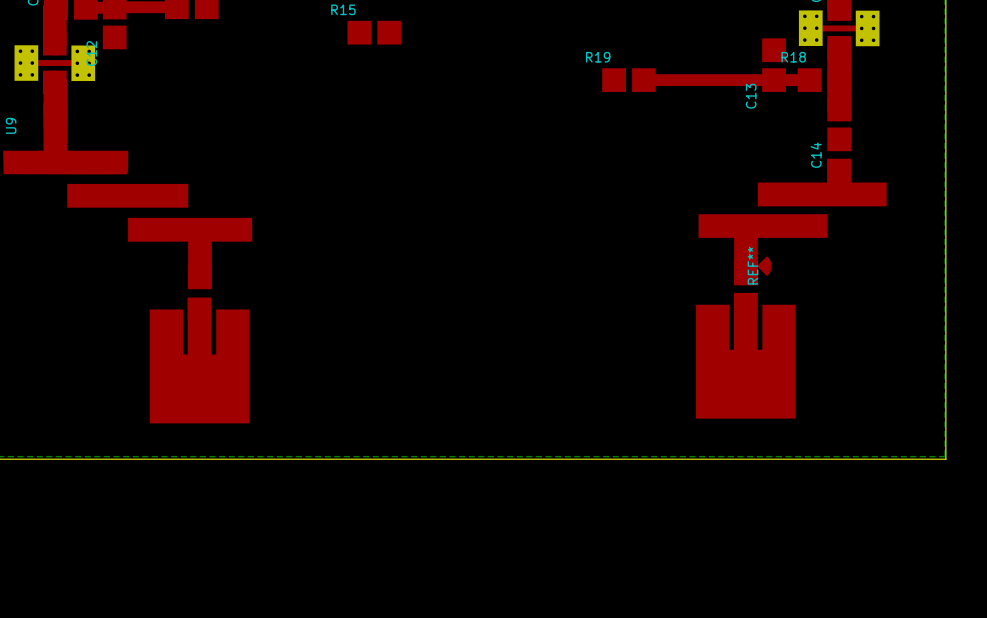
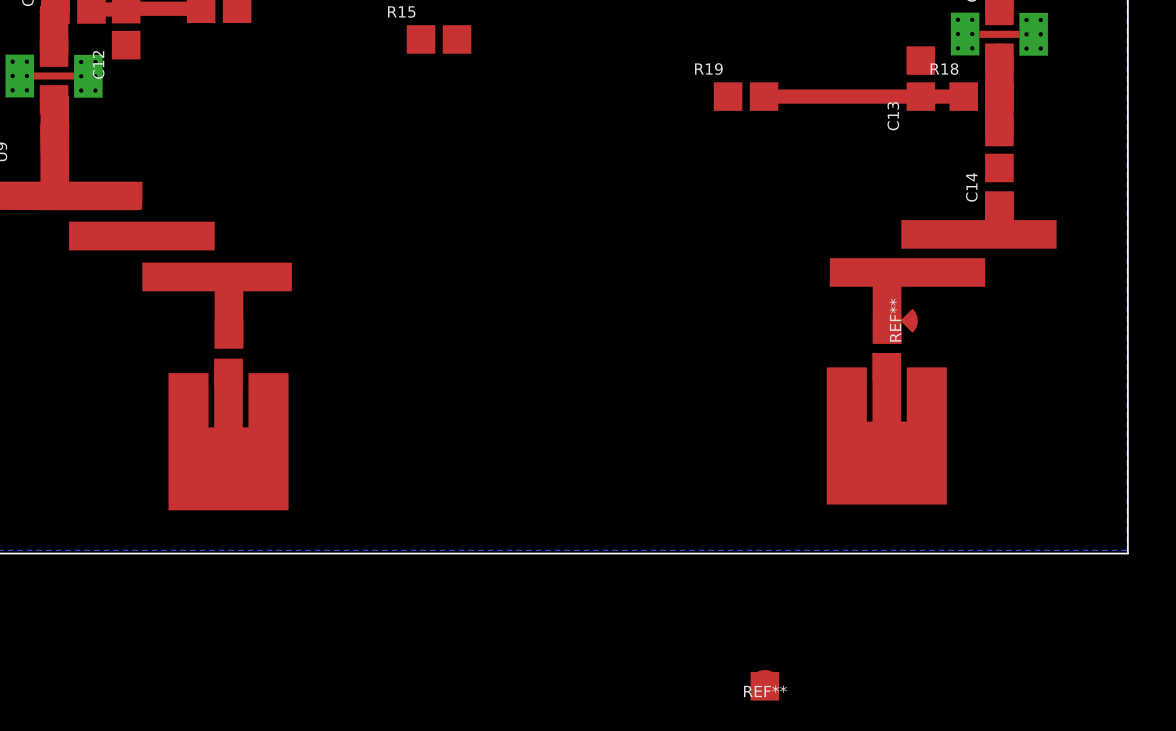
REF**: none -> (764, 685)

